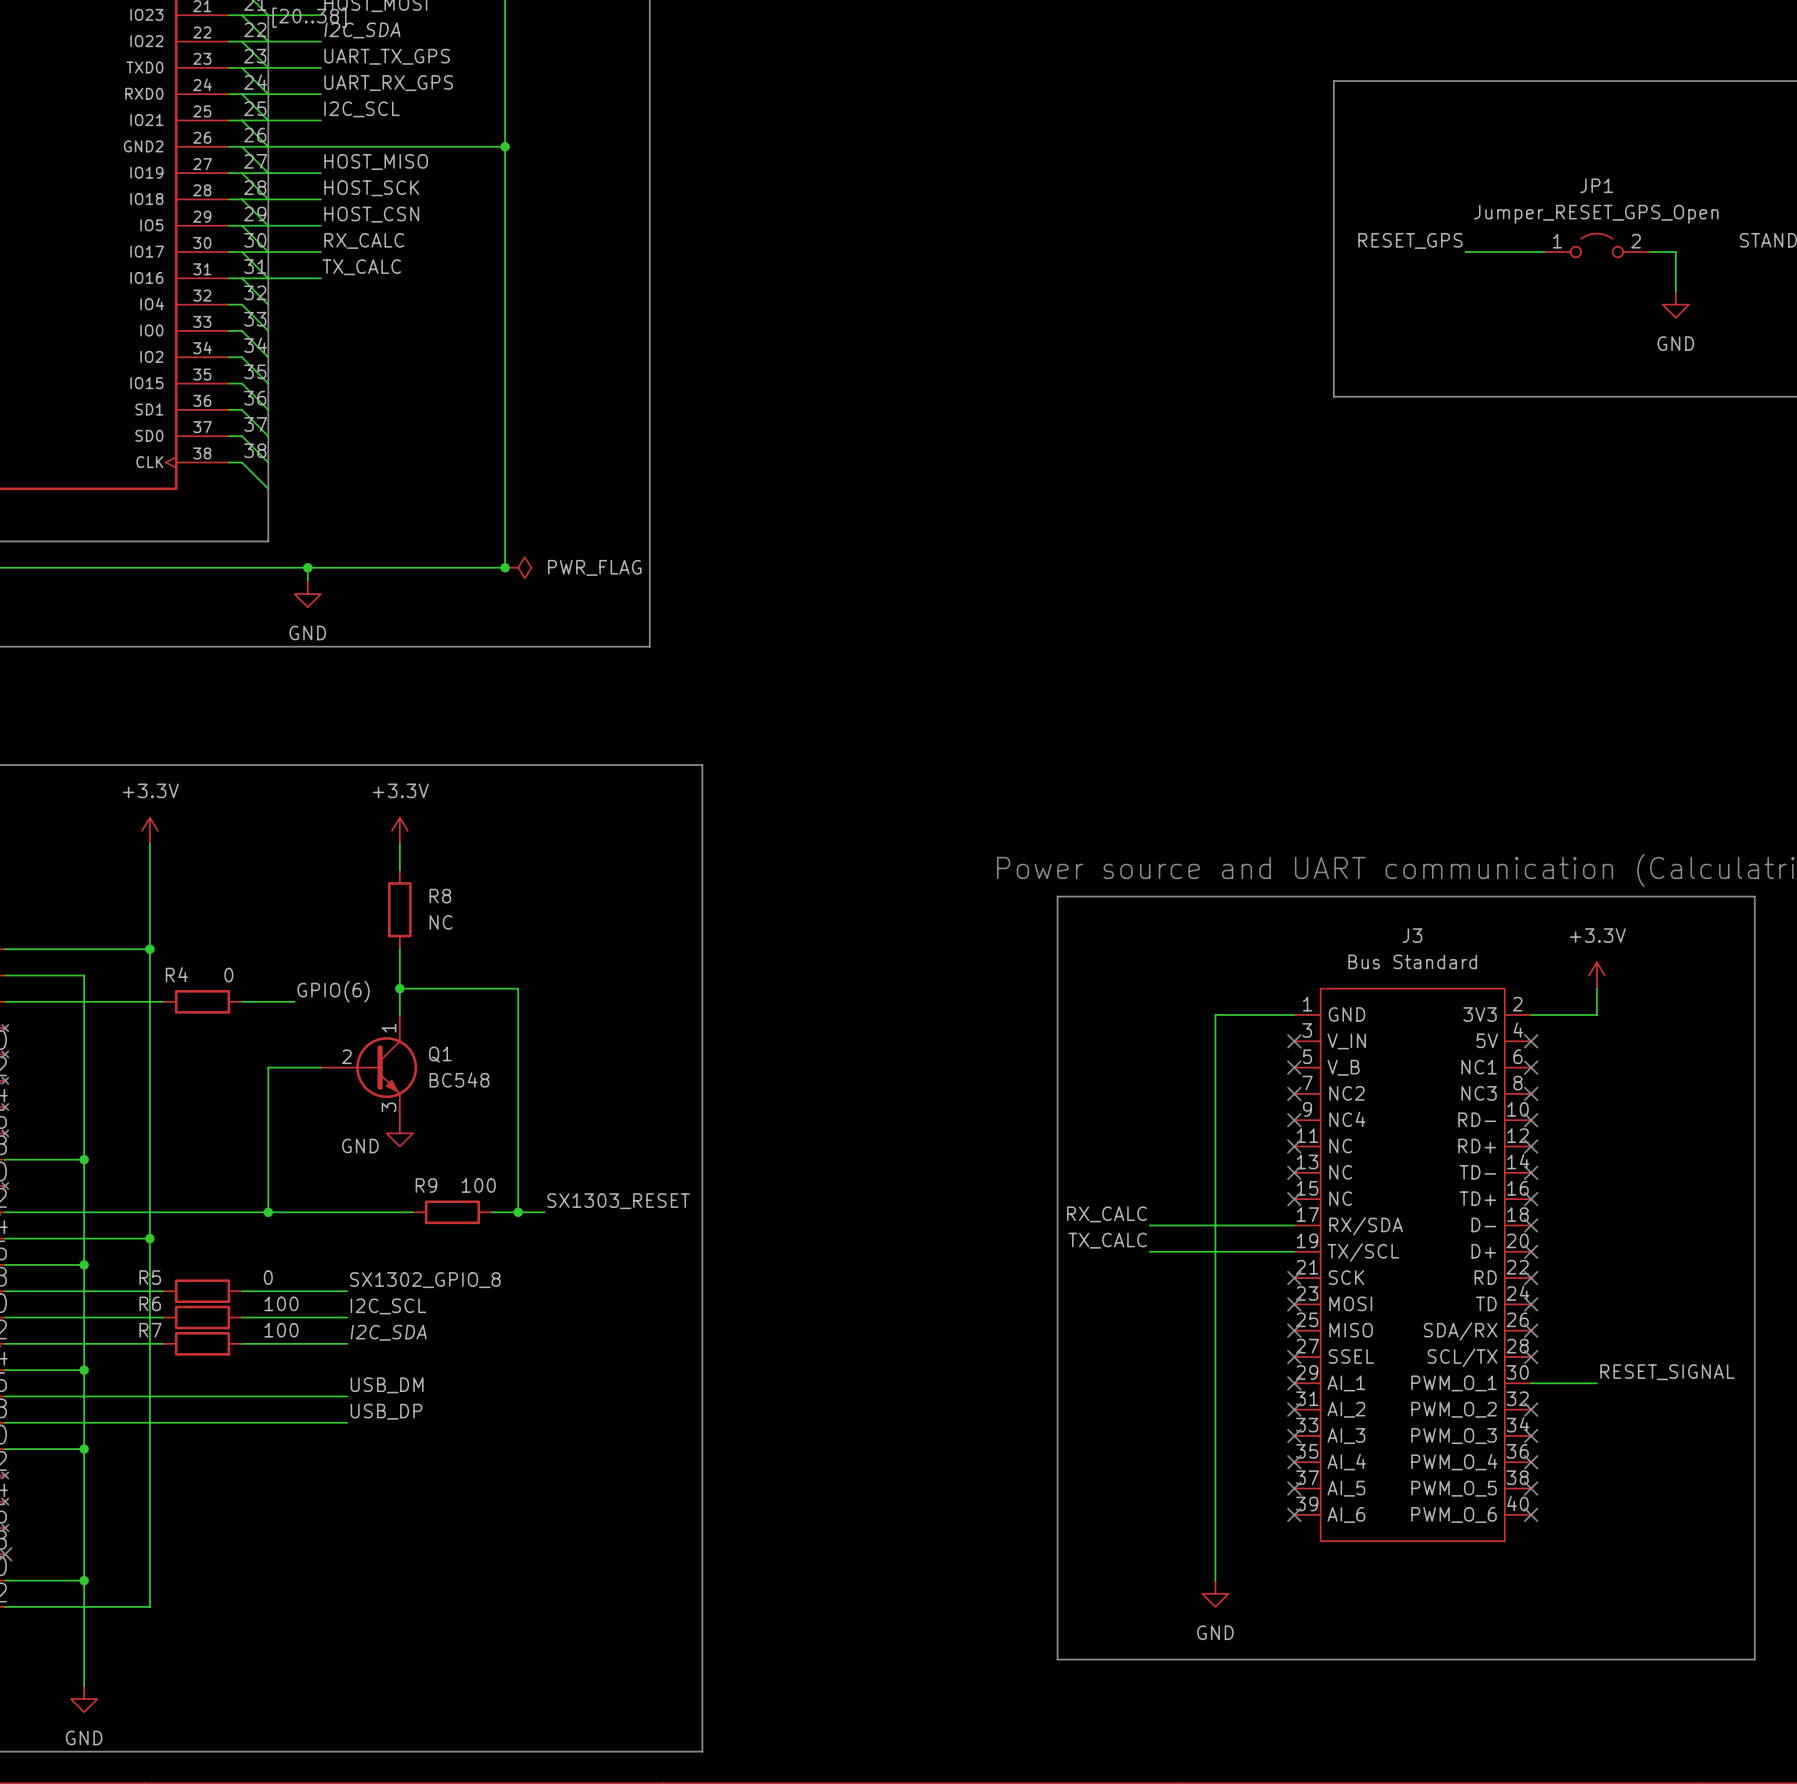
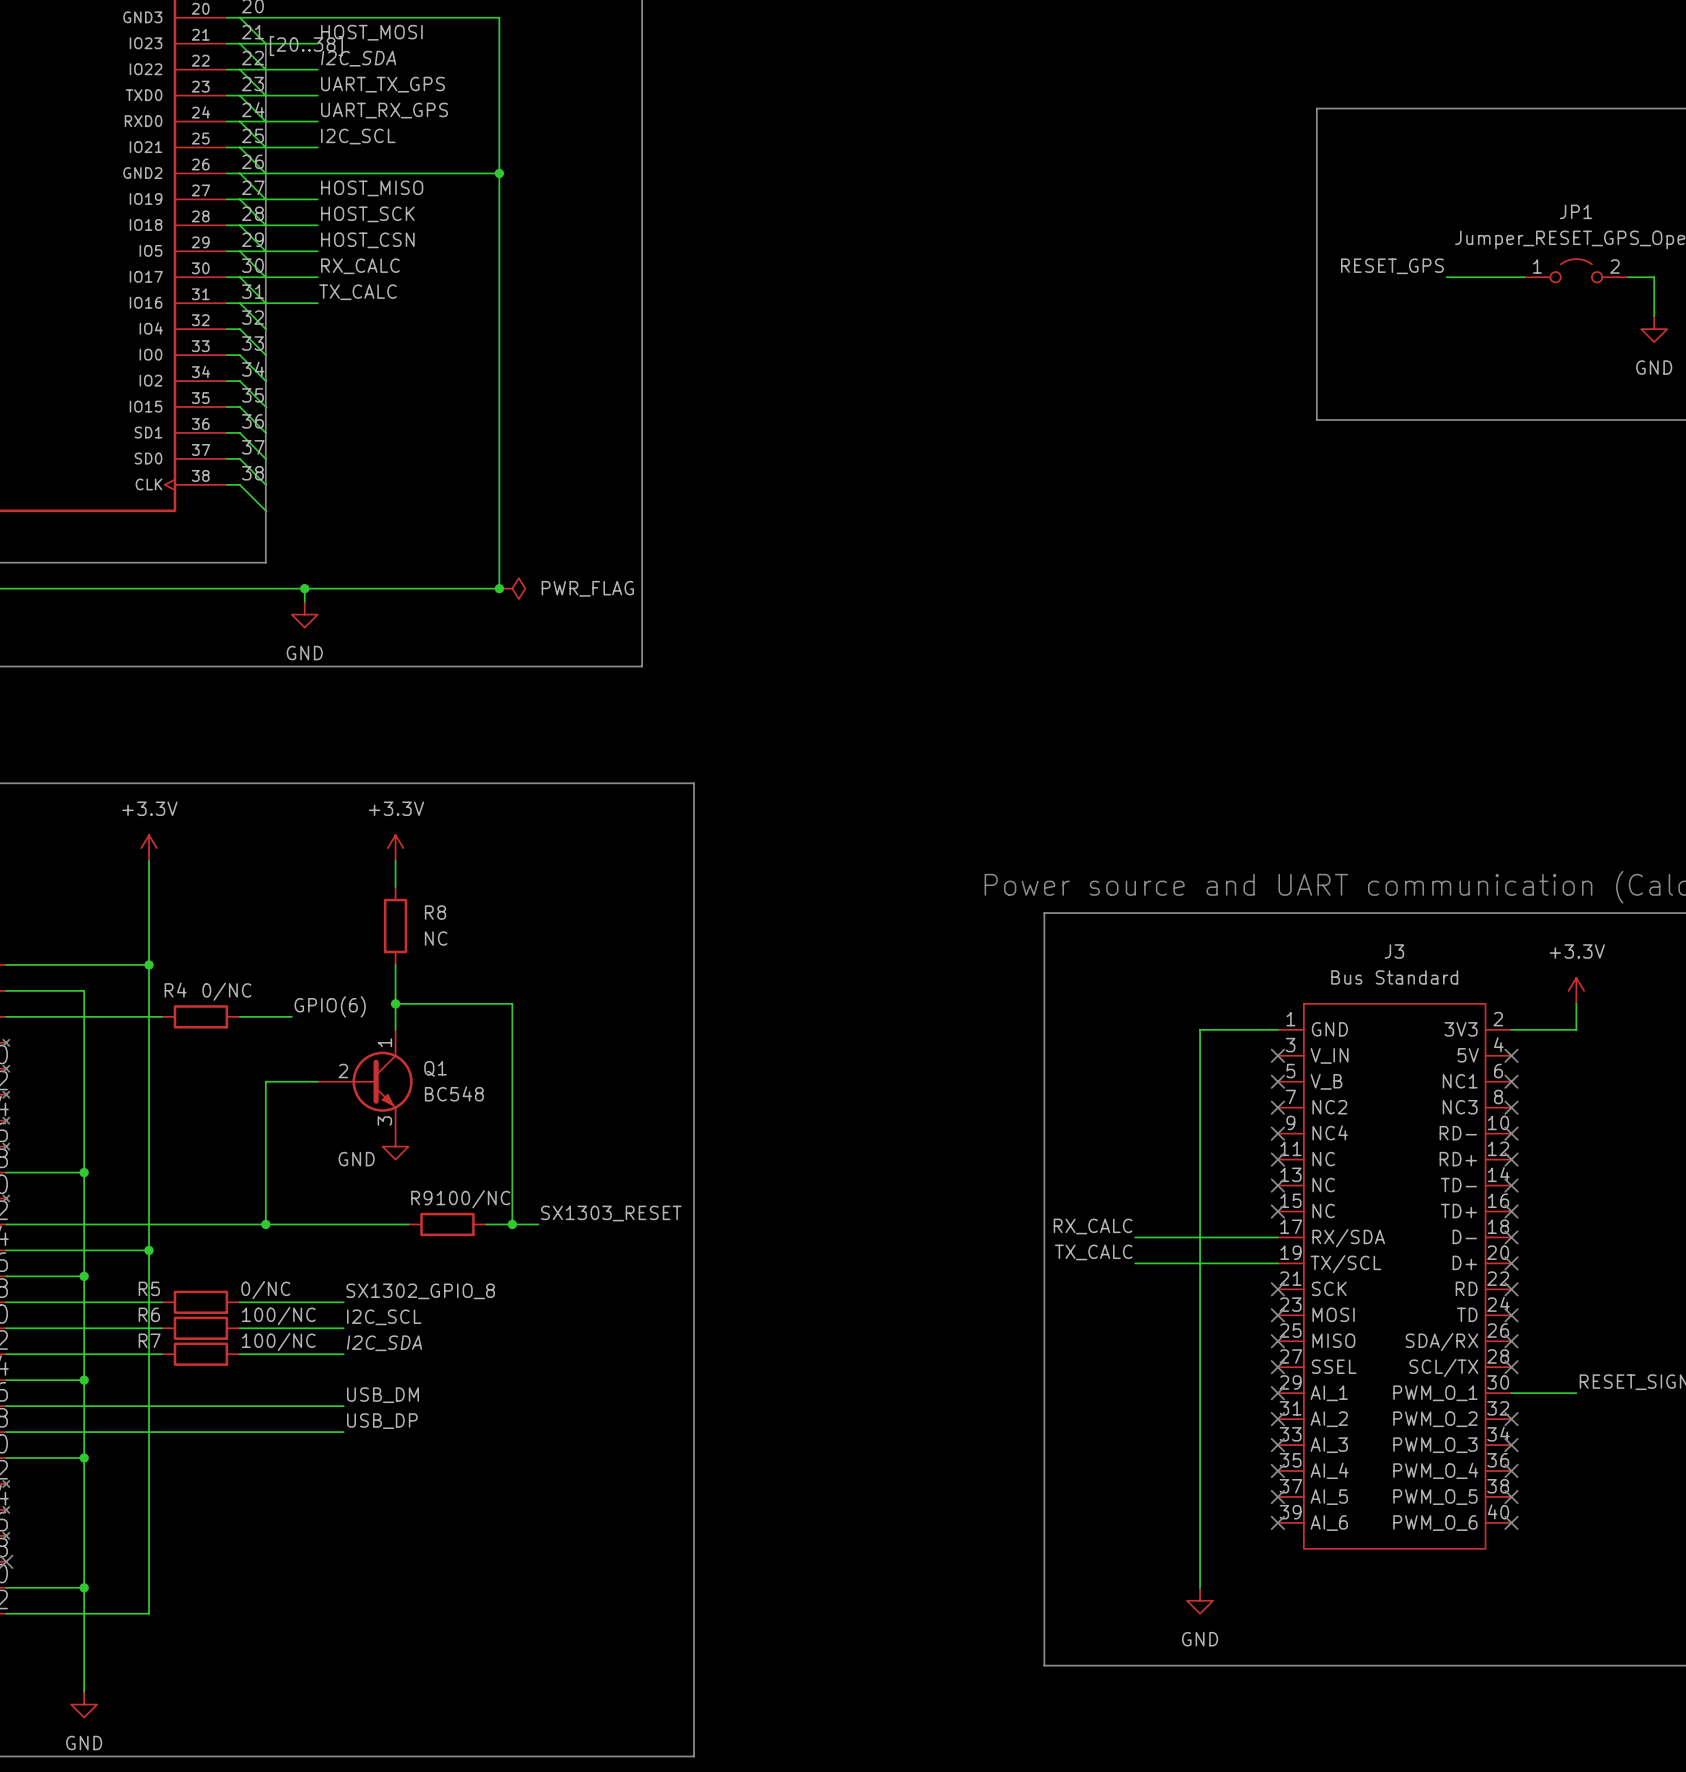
R4 value: 0 (228, 975) -> 0/NC (226, 991)
R9 value: 100 (478, 1185) -> 100/NC (473, 1199)
R5 value: 0 (268, 1277) -> 0/NC (265, 1290)
R6 value: 100 (281, 1303) -> 100/NC (278, 1316)
R7 value: 100 (281, 1330) -> 100/NC (278, 1342)

